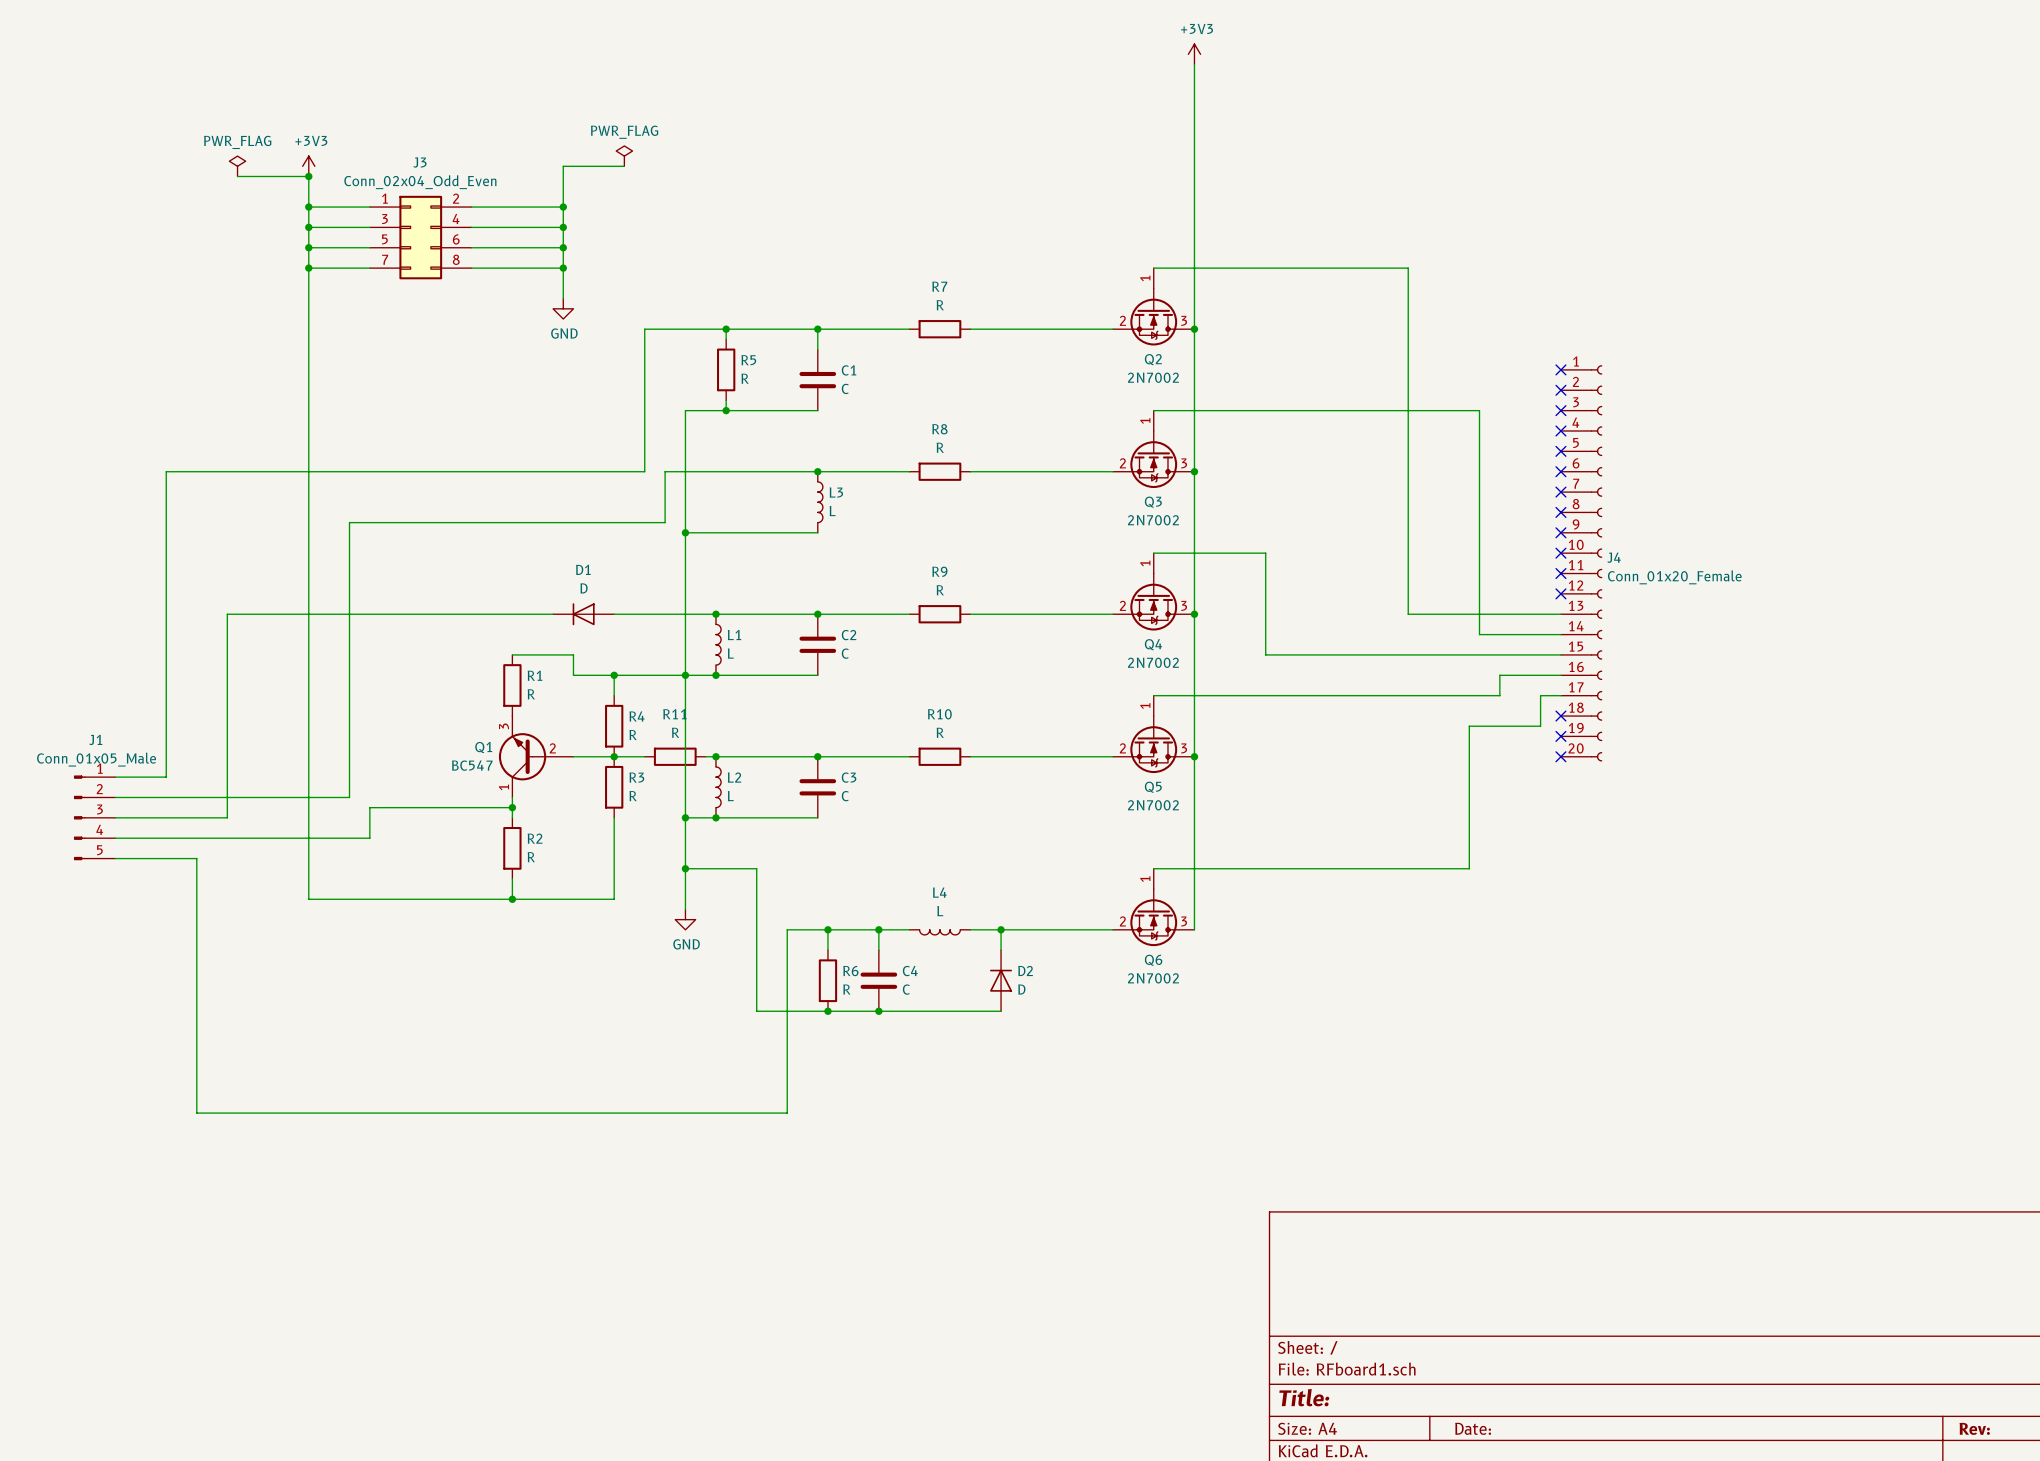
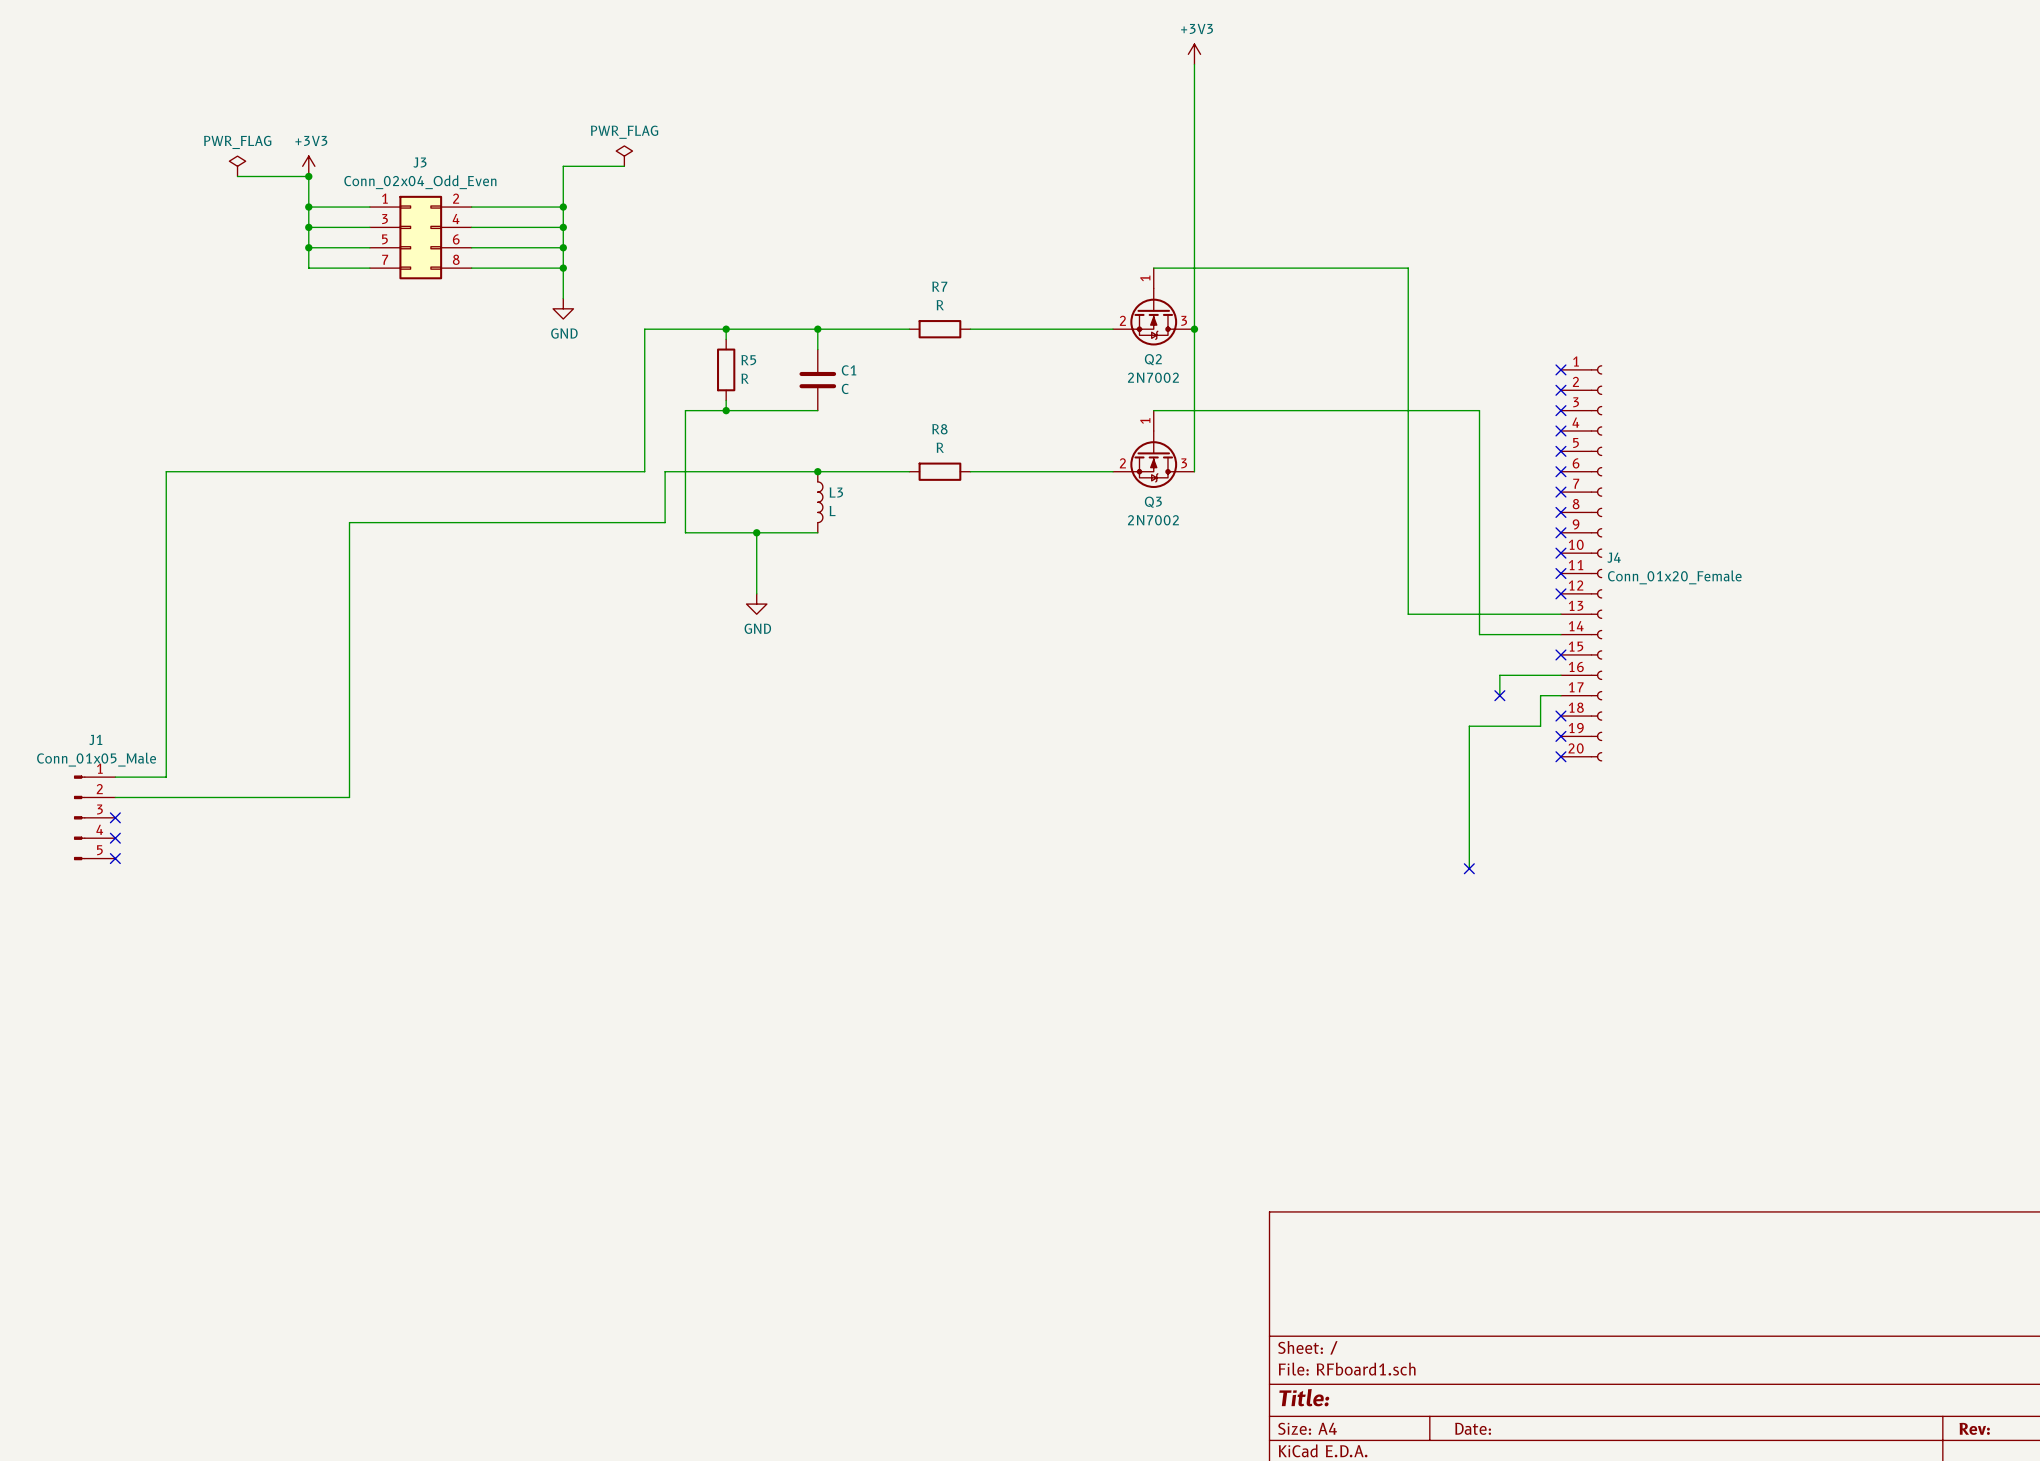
wire: (308, 268) (308, 899) (614, 899) (614, 817) -> none
junction: (308, 268) -> none
wire: (1194, 471) (1194, 929) -> none
junction: (1194, 471) -> none
wire: (685, 532) (685, 909) -> none
junction: (685, 532) -> none
wire: none -> (756, 532) (756, 593)
junction: none -> (756, 532)
wire: (1153, 553) (1265, 553) (1265, 654) (1560, 654) -> none
Q4: 2N7002 (1153, 591) -> none
power symbol: none -> GND (756, 604)
wire: (553, 614) (227, 614) (227, 817) (115, 817) -> none
D1: D (583, 614) -> none
wire: (614, 614) (909, 614) -> none
junction: (715, 614) -> none
junction: (817, 614) -> none
R9: R (939, 614) -> none
wire: (970, 614) (1113, 614) -> none
junction: (1194, 614) -> none
L1: L (718, 644) -> none
C2: C (817, 644) -> none
wire: (512, 654) (573, 654) (573, 675) (817, 675) -> none
no-connect mark: none -> (1560, 654)
wire: (614, 675) (614, 695) -> none
junction: (614, 675) -> none
junction: (685, 675) -> none
junction: (715, 675) -> none
R1: R (512, 685) -> none
wire: (1153, 695) (1499, 695) -> none
no-connect mark: none -> (1499, 695)
R4: R (614, 726) -> none
Q5: 2N7002 (1153, 734) -> none
Q1: BC547 (536, 756) -> none
wire: (573, 756) (644, 756) -> none
junction: (614, 756) -> none
R11: R (675, 756) -> none
wire: (705, 756) (909, 756) -> none
junction: (715, 756) -> none
junction: (817, 756) -> none
R10: R (939, 756) -> none
wire: (970, 756) (1113, 756) -> none
junction: (1194, 756) -> none
R3: R (614, 787) -> none
L2: L (718, 787) -> none
C3: C (817, 787) -> none
wire: (512, 797) (512, 817) -> none
wire: (512, 807) (369, 807) (369, 838) (115, 838) -> none
junction: (512, 807) -> none
no-connect mark: none -> (115, 817)
wire: (685, 817) (817, 817) -> none
junction: (685, 817) -> none
junction: (715, 817) -> none
no-connect mark: none -> (115, 838)
R2: R (512, 848) -> none
wire: (115, 858) (196, 858) (196, 1113) (787, 1113) (787, 929) (909, 929) -> none
no-connect mark: none -> (115, 858)
wire: (685, 868) (756, 868) (756, 1011) (1001, 1011) -> none
junction: (685, 868) -> none
wire: (1153, 868) (1469, 868) -> none
no-connect mark: none -> (1469, 868)
wire: (512, 878) (512, 899) -> none
junction: (512, 899) -> none
Q6: 2N7002 (1153, 907) -> none
power symbol: GND (685, 919) -> none
wire: (827, 929) (827, 950) -> none
junction: (827, 929) -> none
wire: (878, 929) (878, 950) -> none
junction: (878, 929) -> none
wire: (970, 929) (1113, 929) -> none
wire: (1001, 929) (1001, 950) -> none
junction: (1001, 929) -> none
L4: L (939, 932) -> none
R6: R (827, 980) -> none
C4: C (878, 980) -> none
D2: D (1001, 980) -> none
junction: (827, 1011) -> none
junction: (878, 1011) -> none

